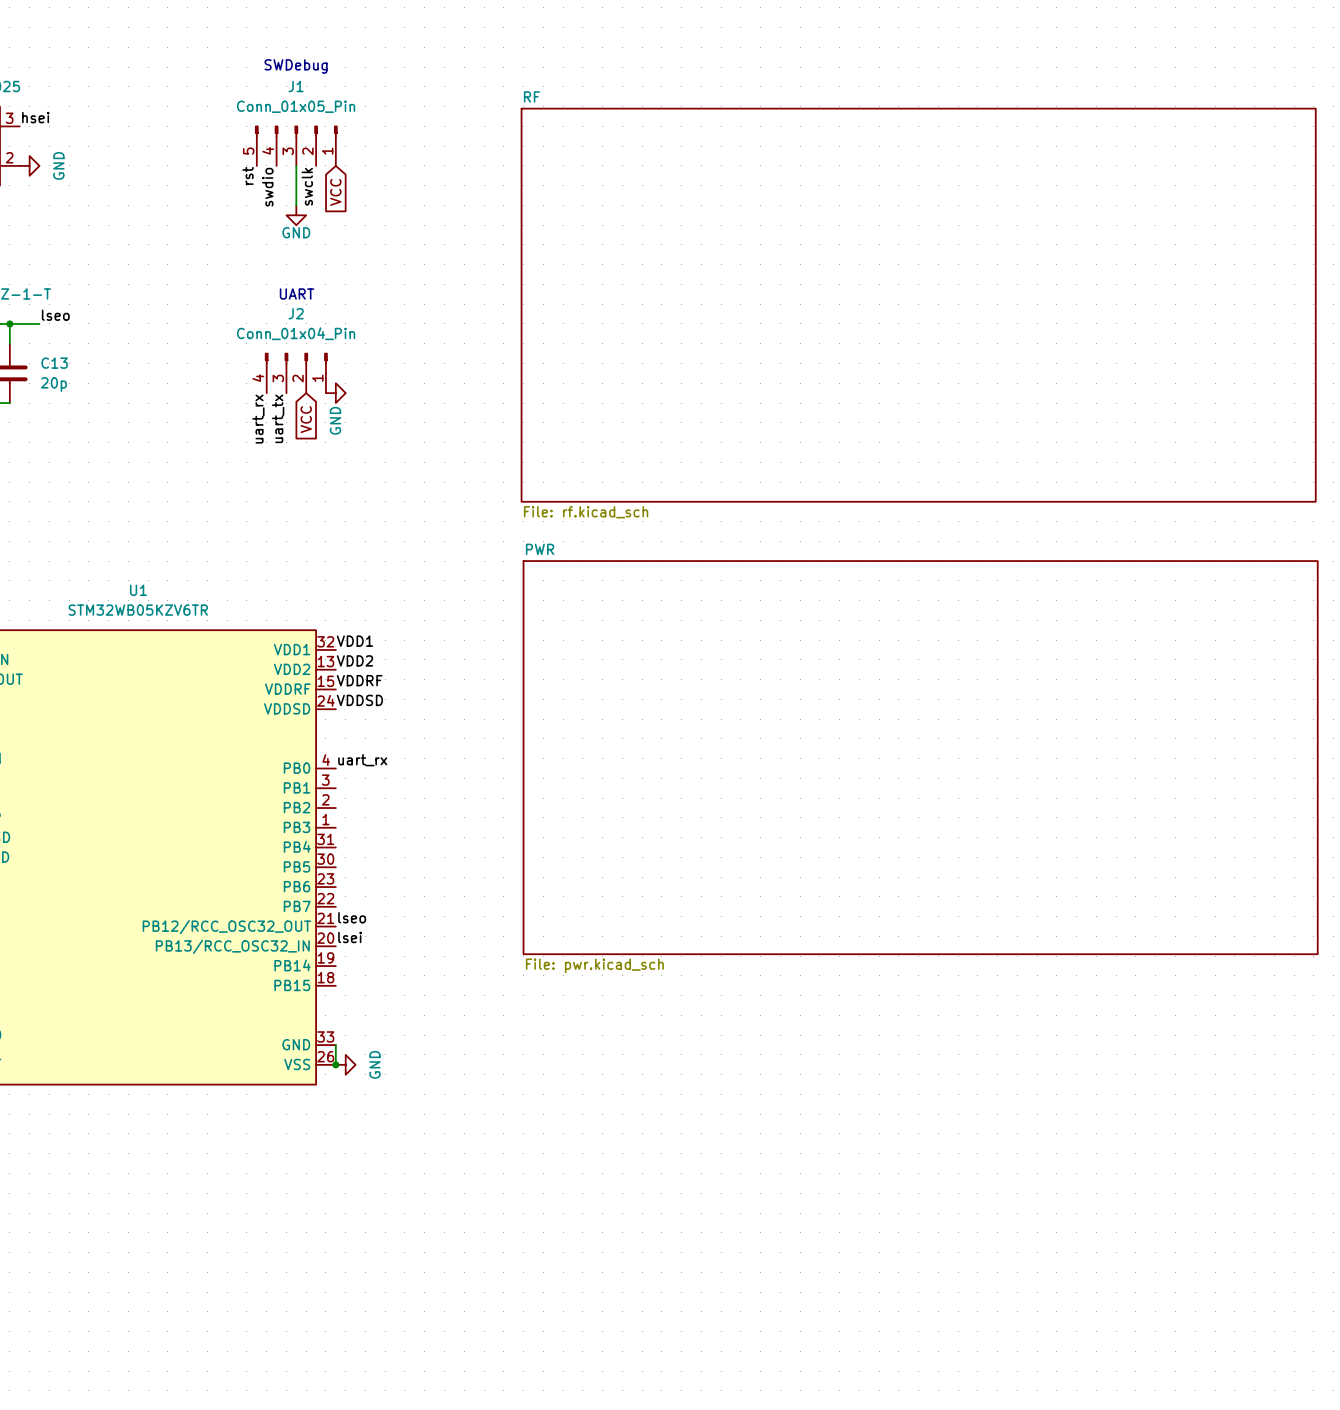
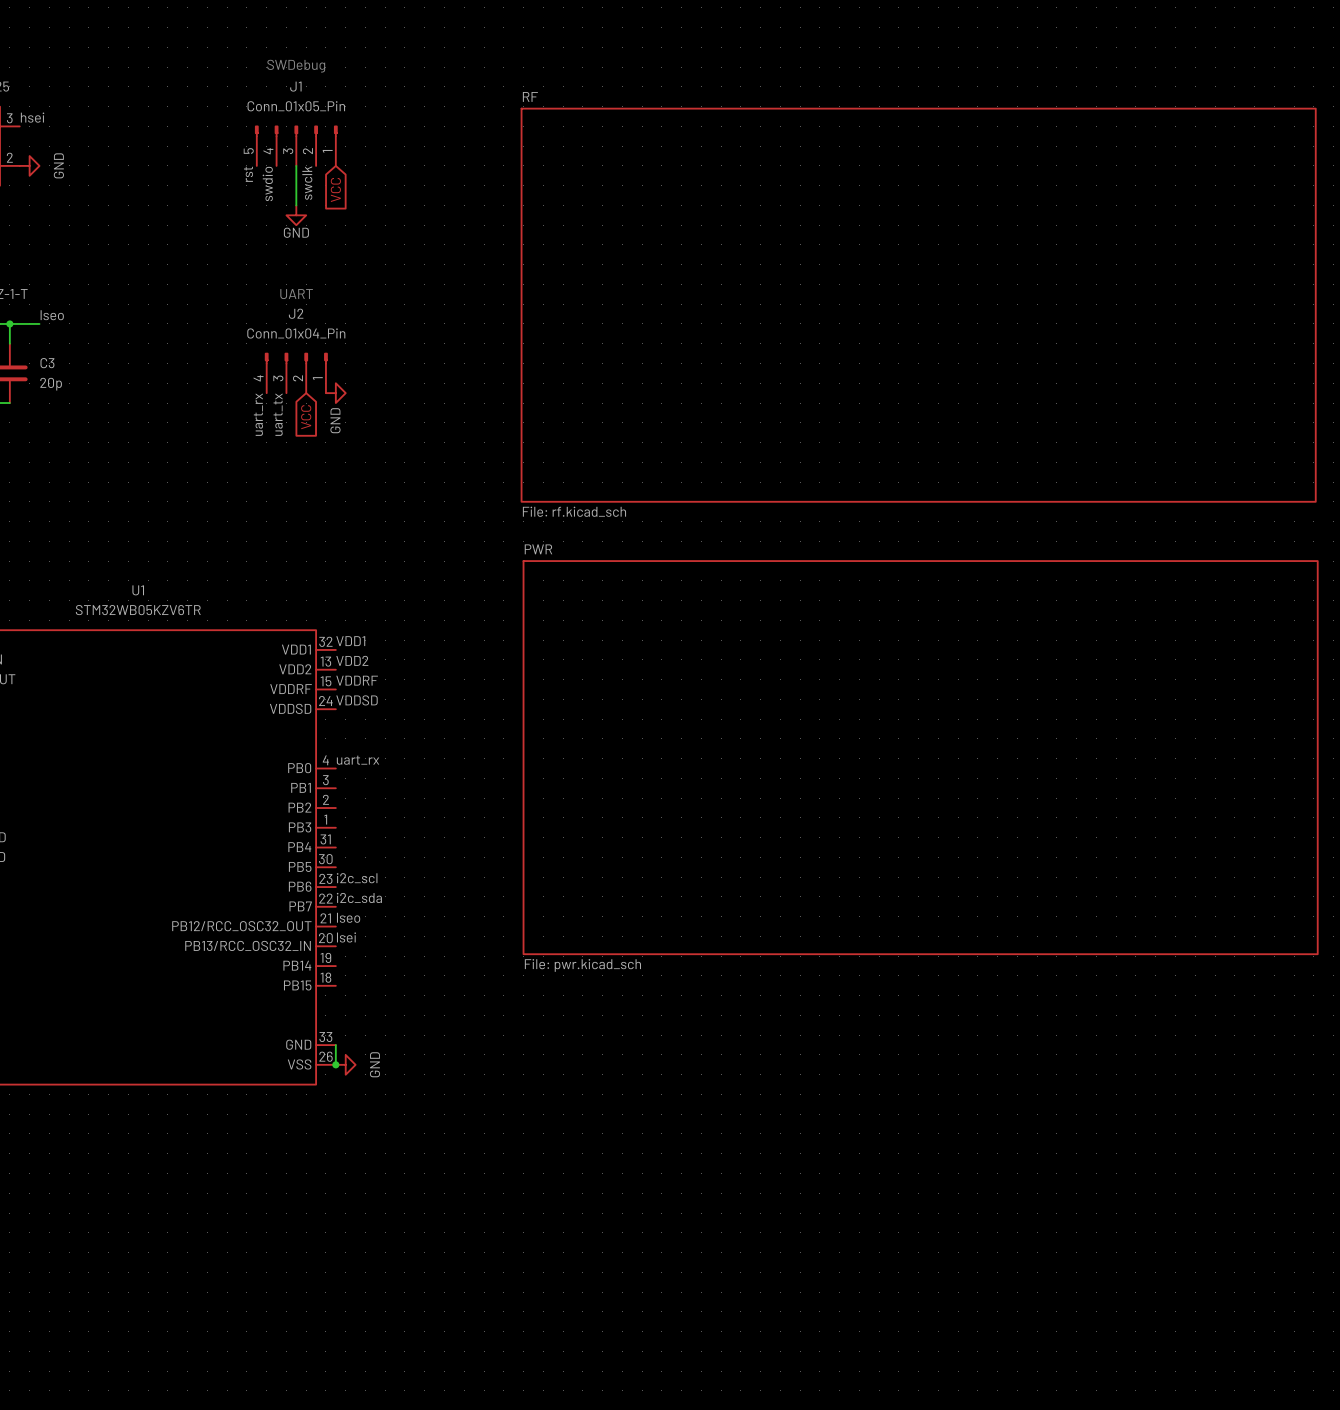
C13 name: C13 (54, 363) -> C3 (47, 363)
label: none -> i2c_scl (357, 878)
label: none -> i2c_sda (359, 897)

